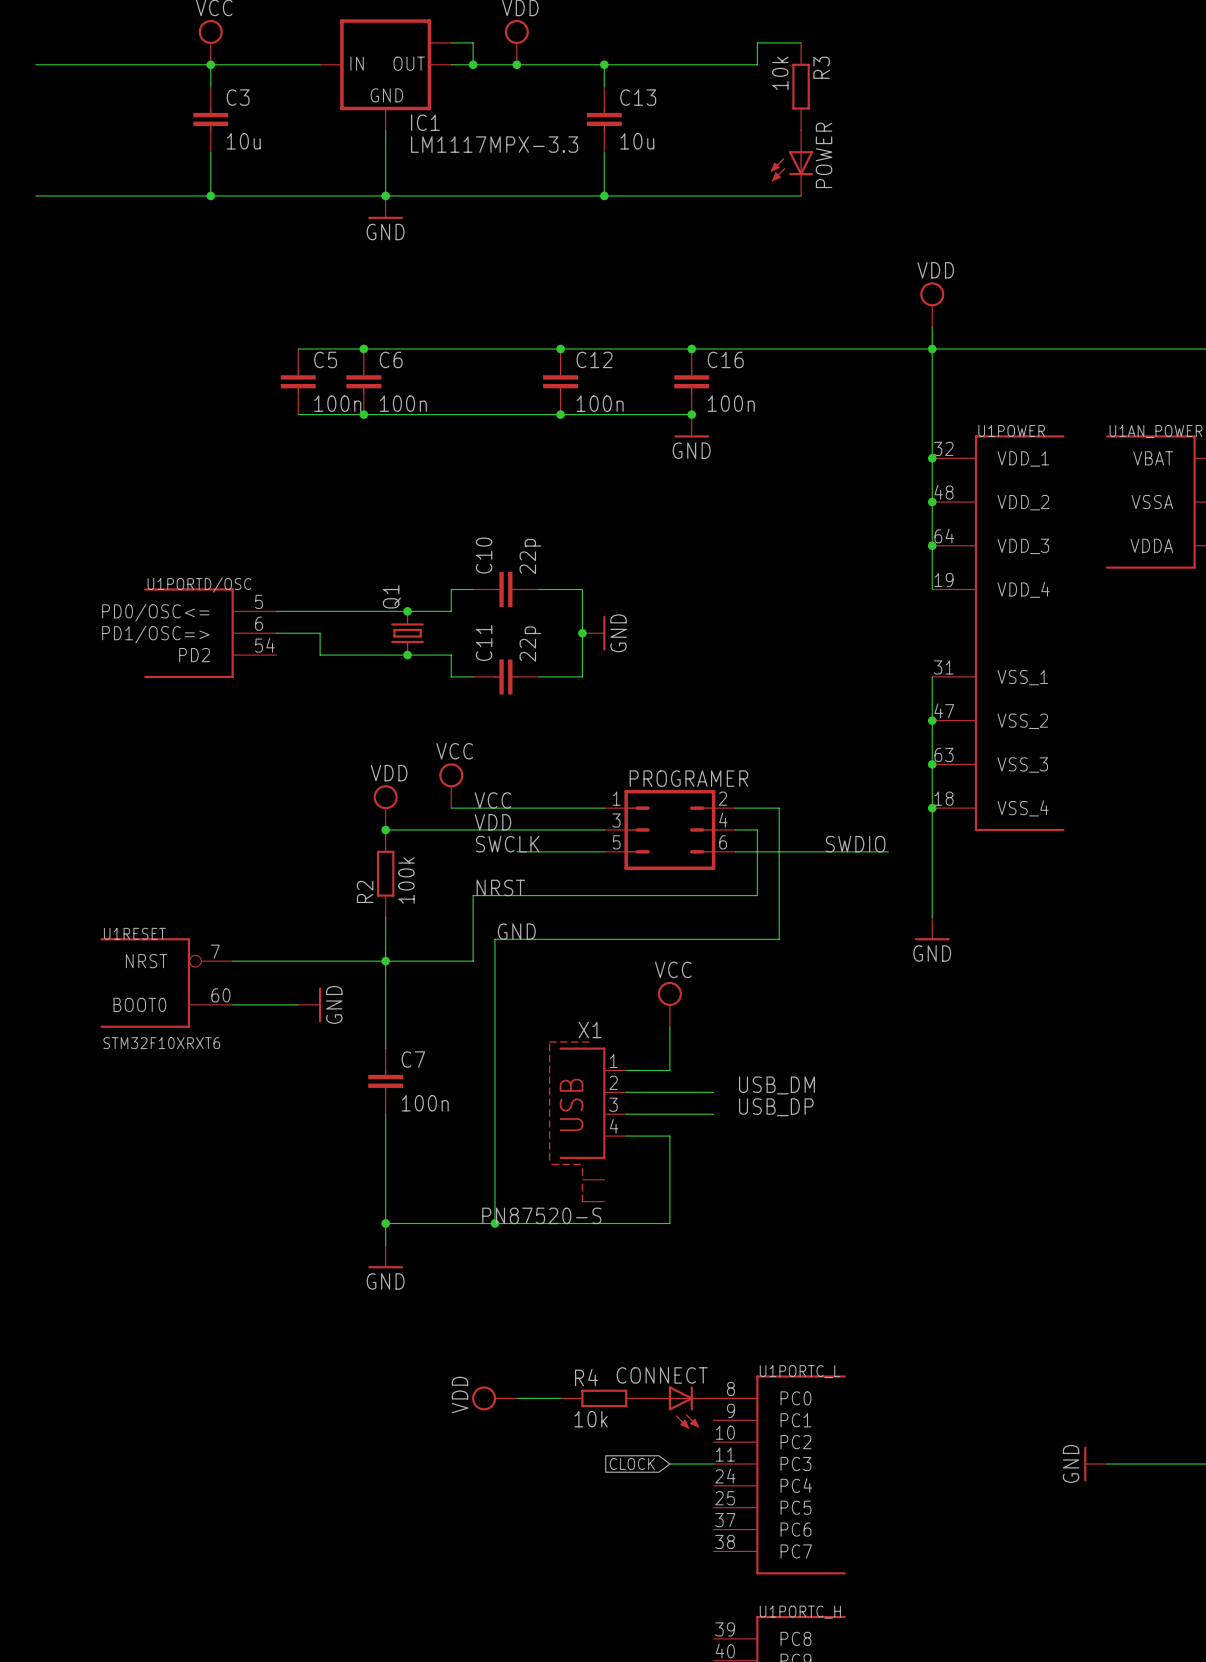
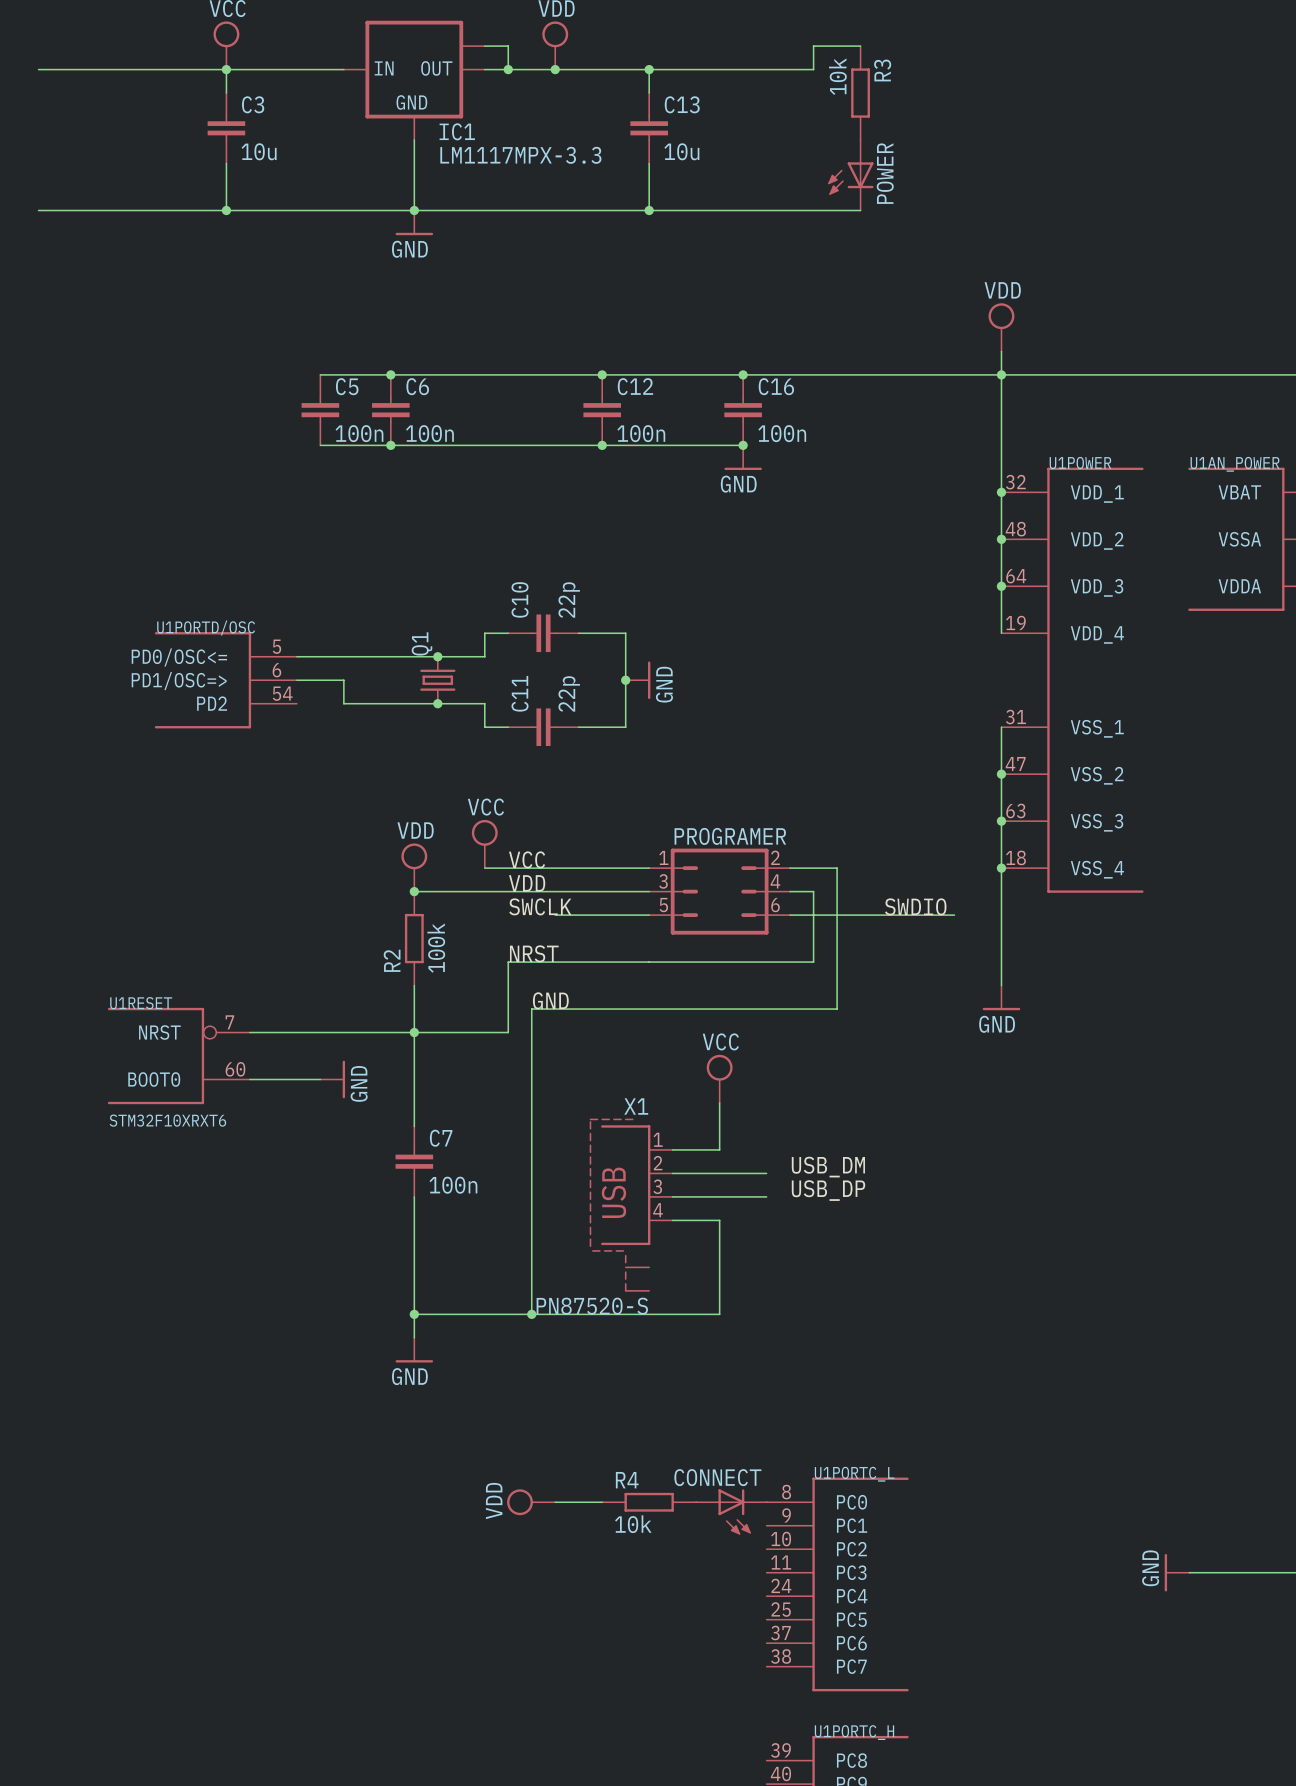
global label: CLOCK (632, 1464) -> none
wire: (669, 1464) (713, 1464) -> none

